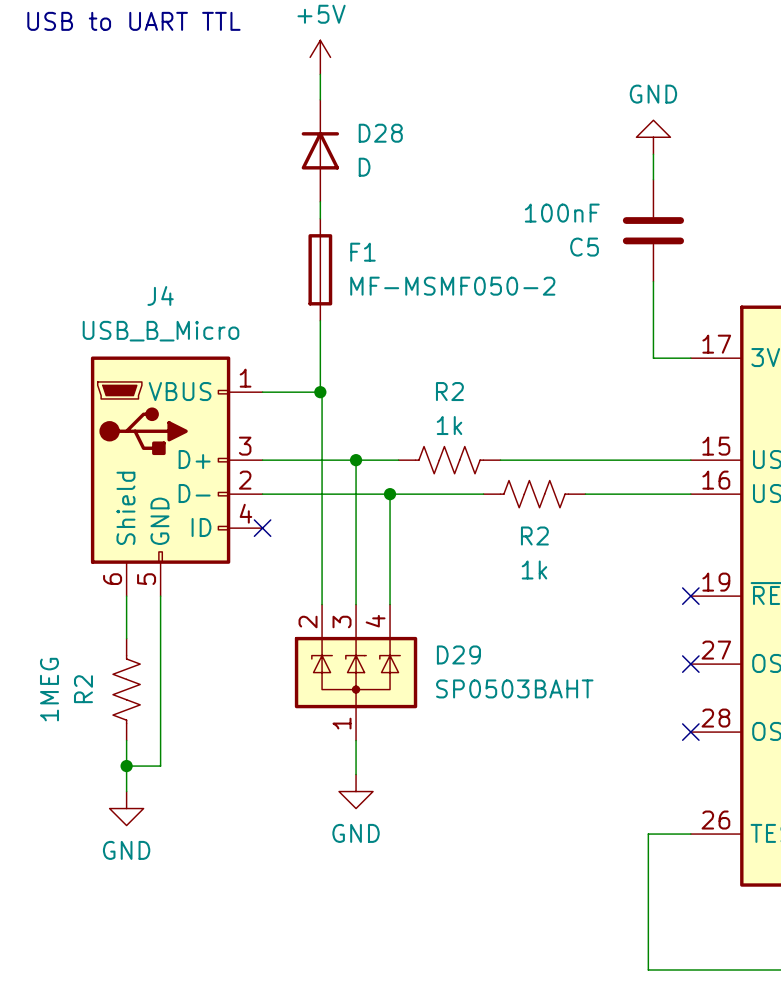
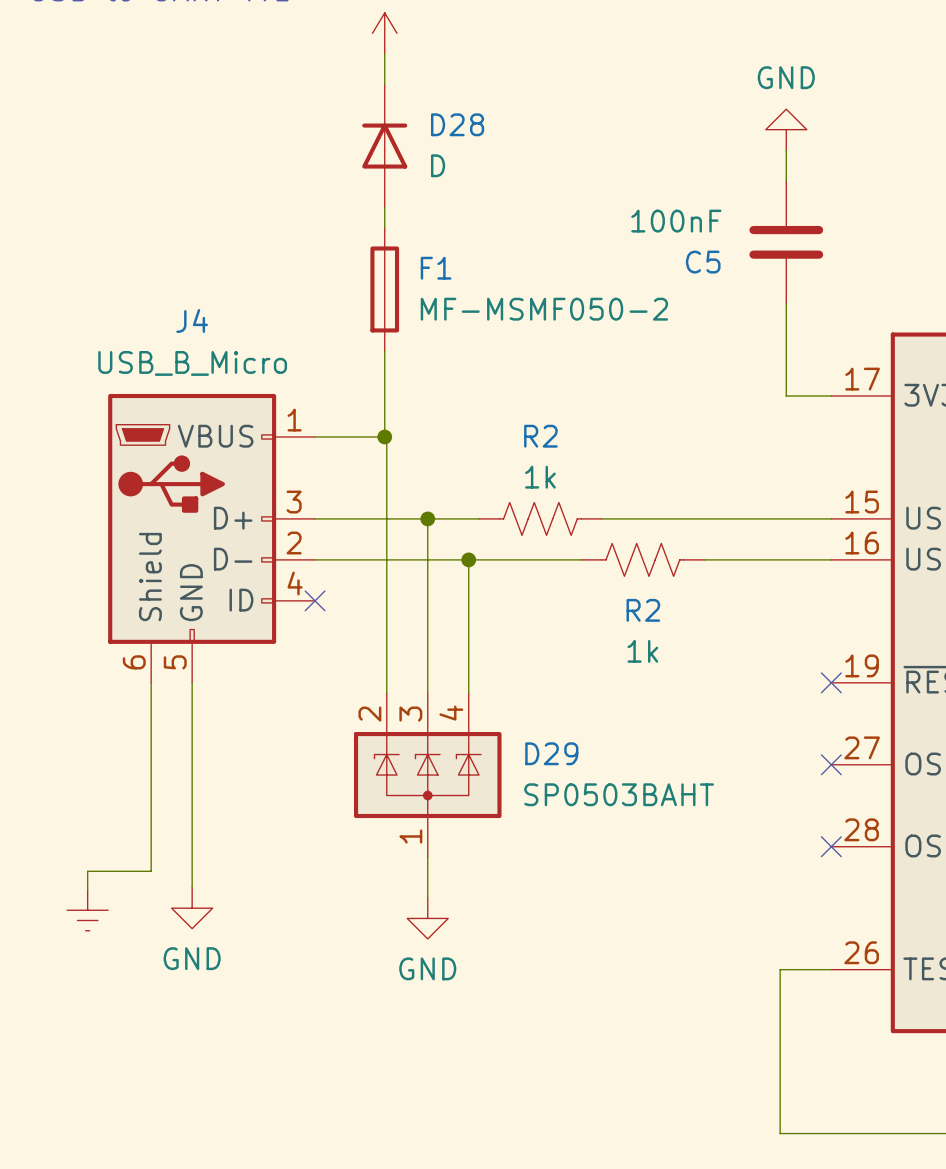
wire: none -> (151, 734) (151, 856)
R2: 1MEG (126, 689) -> none
wire: (126, 752) (126, 791) -> (151, 871) (87, 871) (87, 889)
wire: (126, 766) (160, 766) -> none
junction: (126, 766) -> none
power symbol: none -> (87, 910)
power symbol position: GND (126, 808) -> GND (192, 908)

